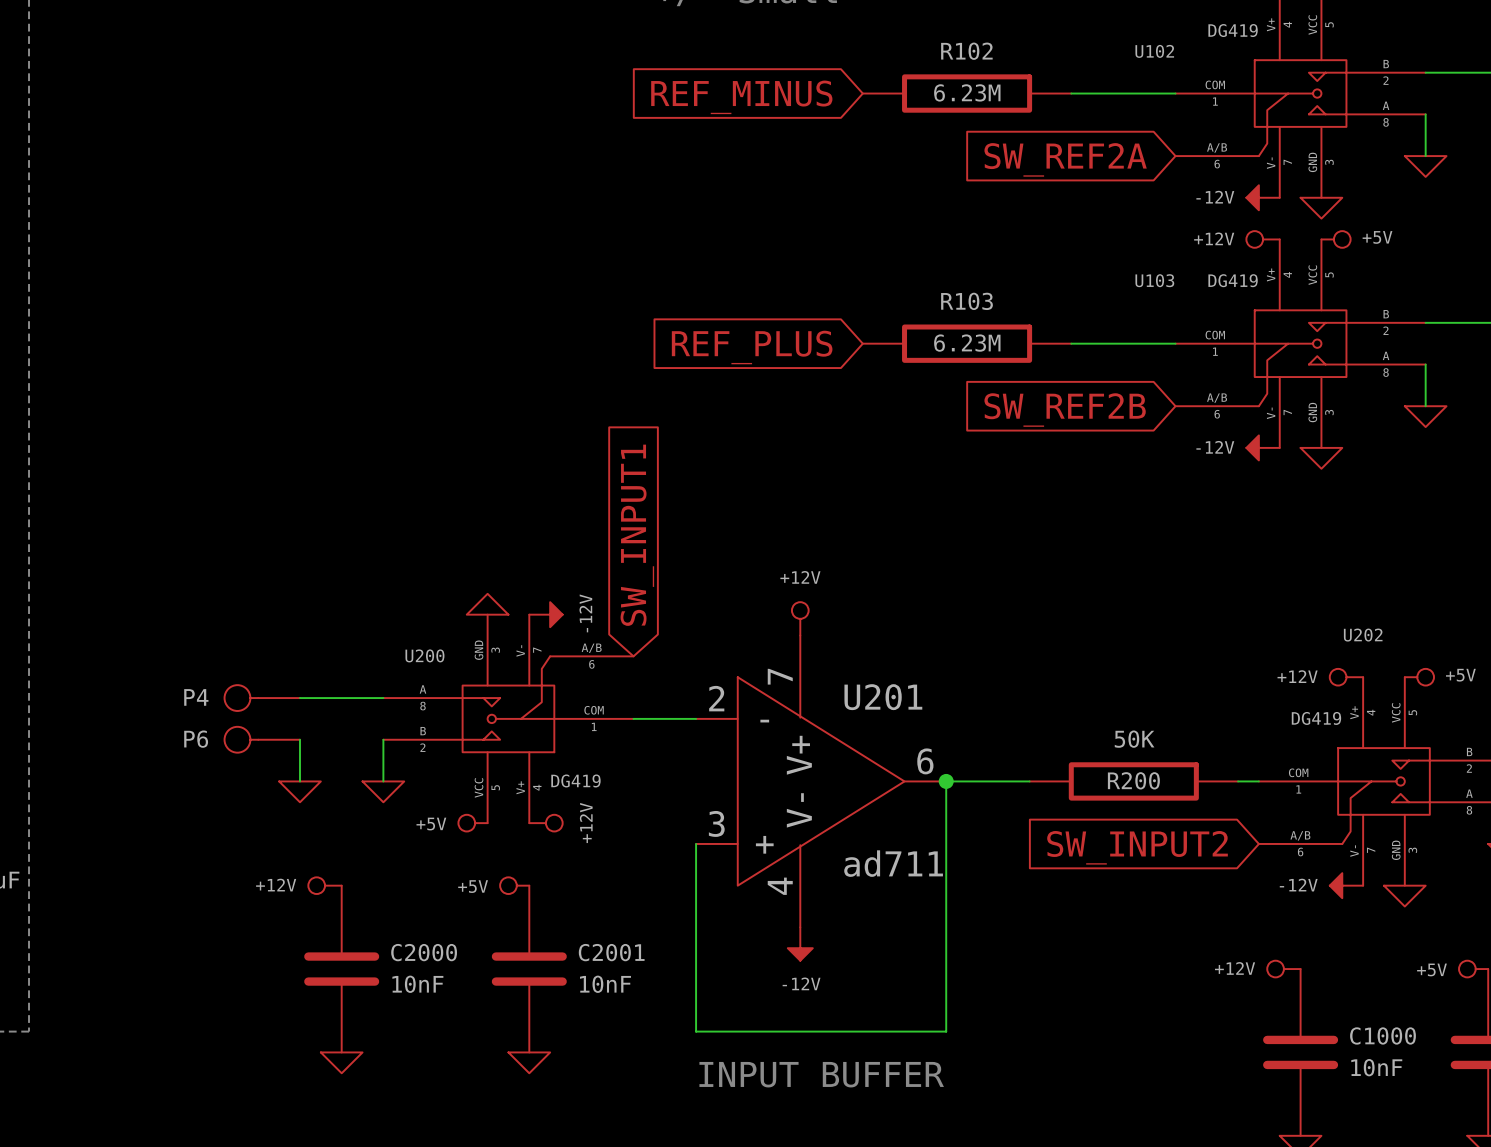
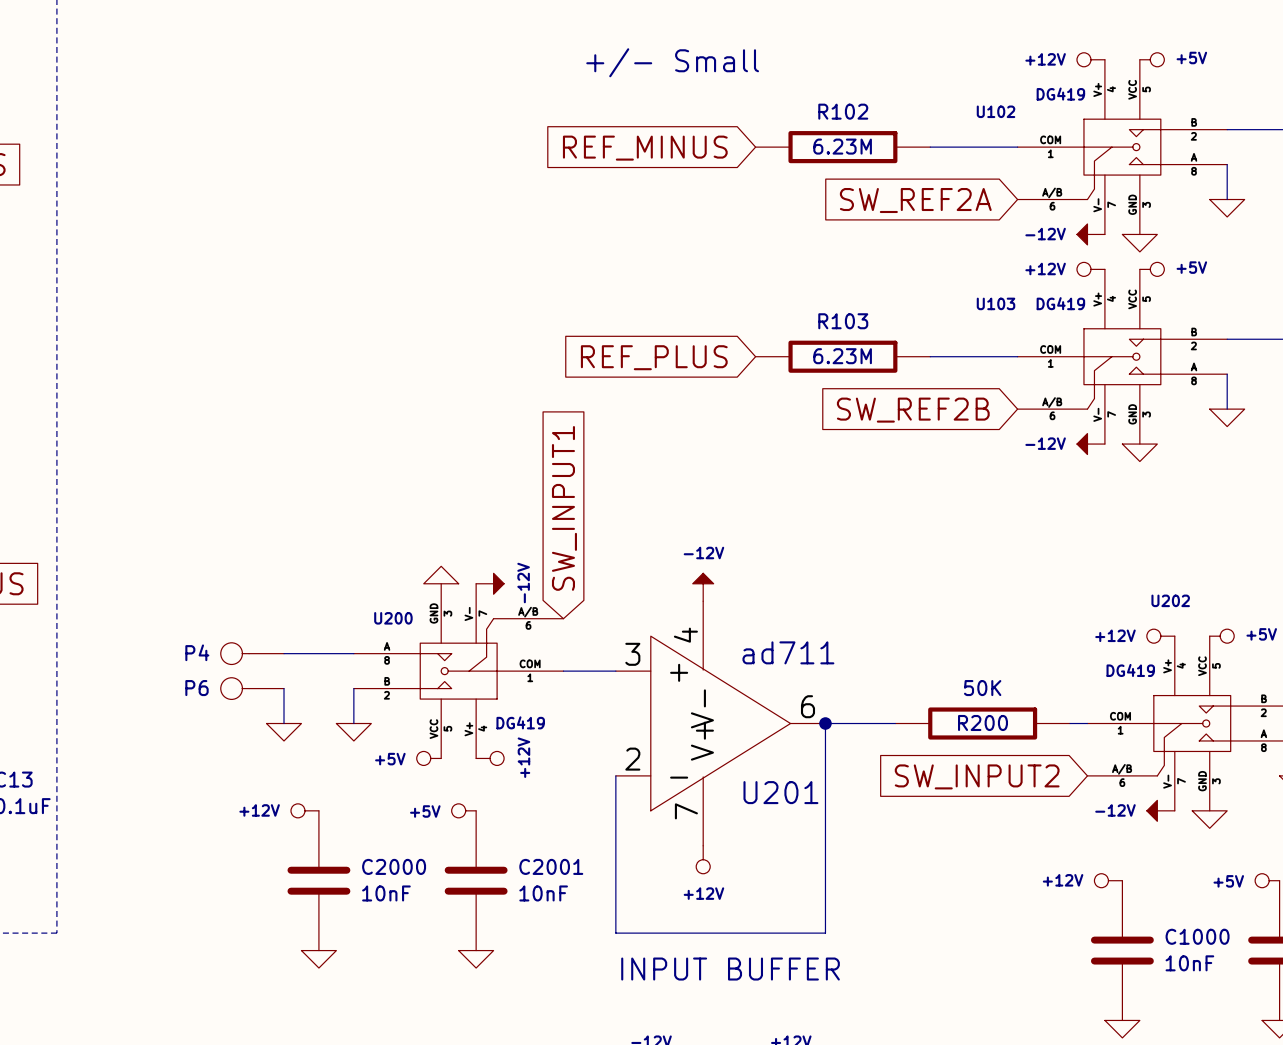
power symbol: +12V (800, 618) -> -12V (703, 587)
U201 flip: as is (821, 781) -> up-down (720, 723)
power symbol: -12V (800, 944) -> +12V (703, 859)

